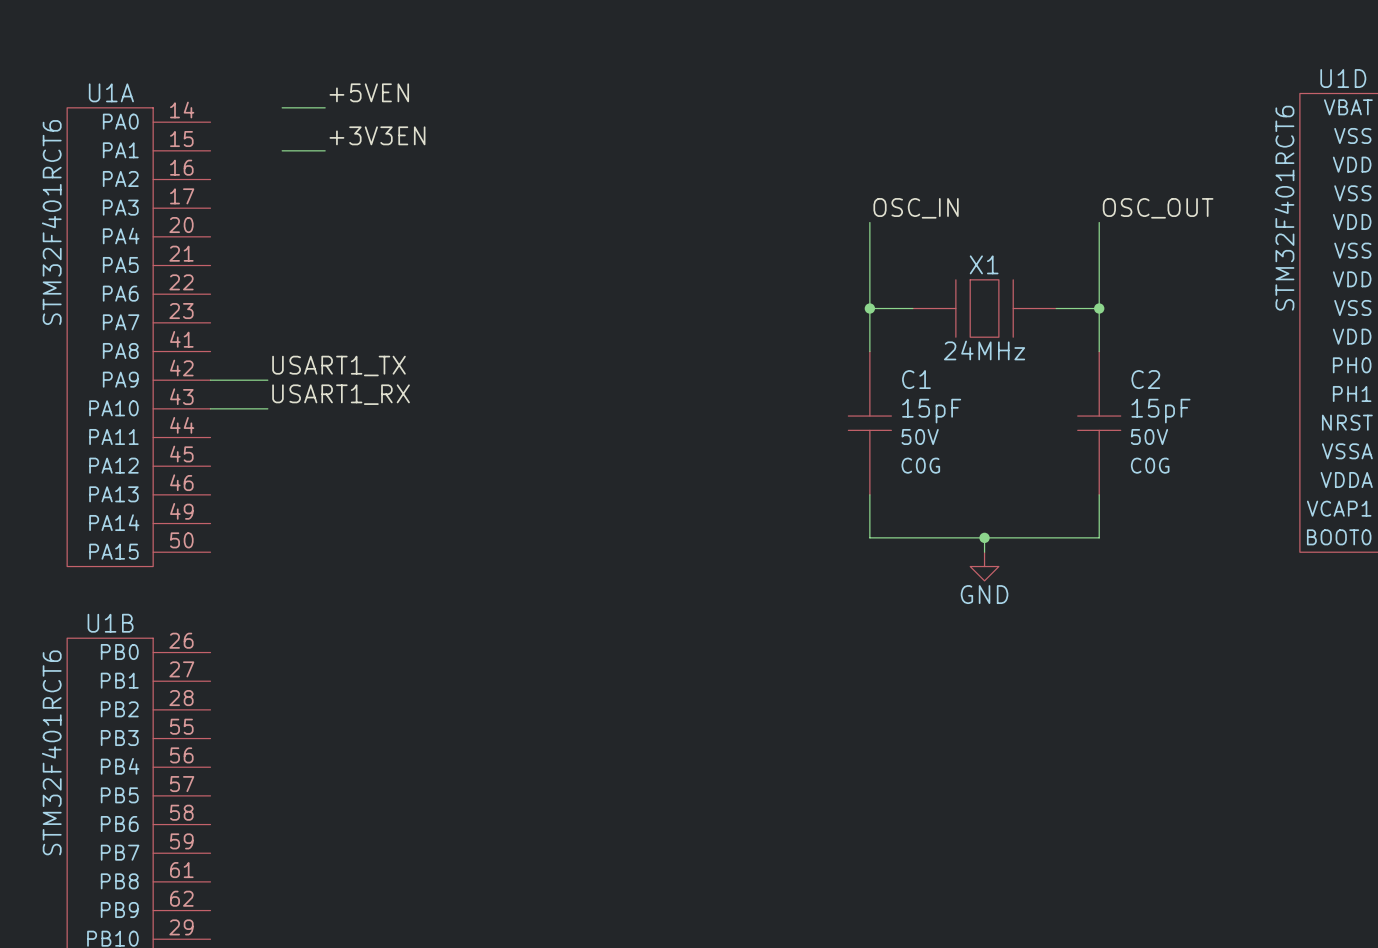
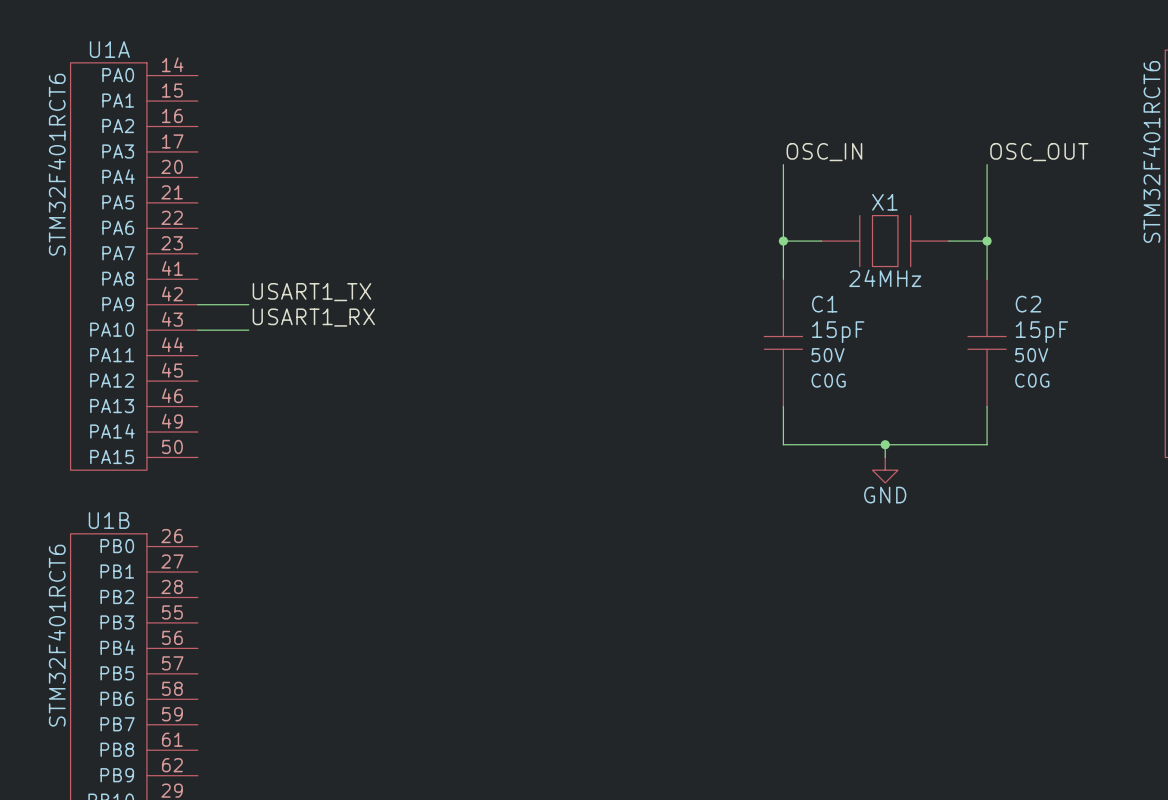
label: +5VEN (369, 92) -> none
wire: (282, 107) (325, 107) -> none
label: +3V3EN (377, 135) -> none
wire: (282, 150) (325, 150) -> none

